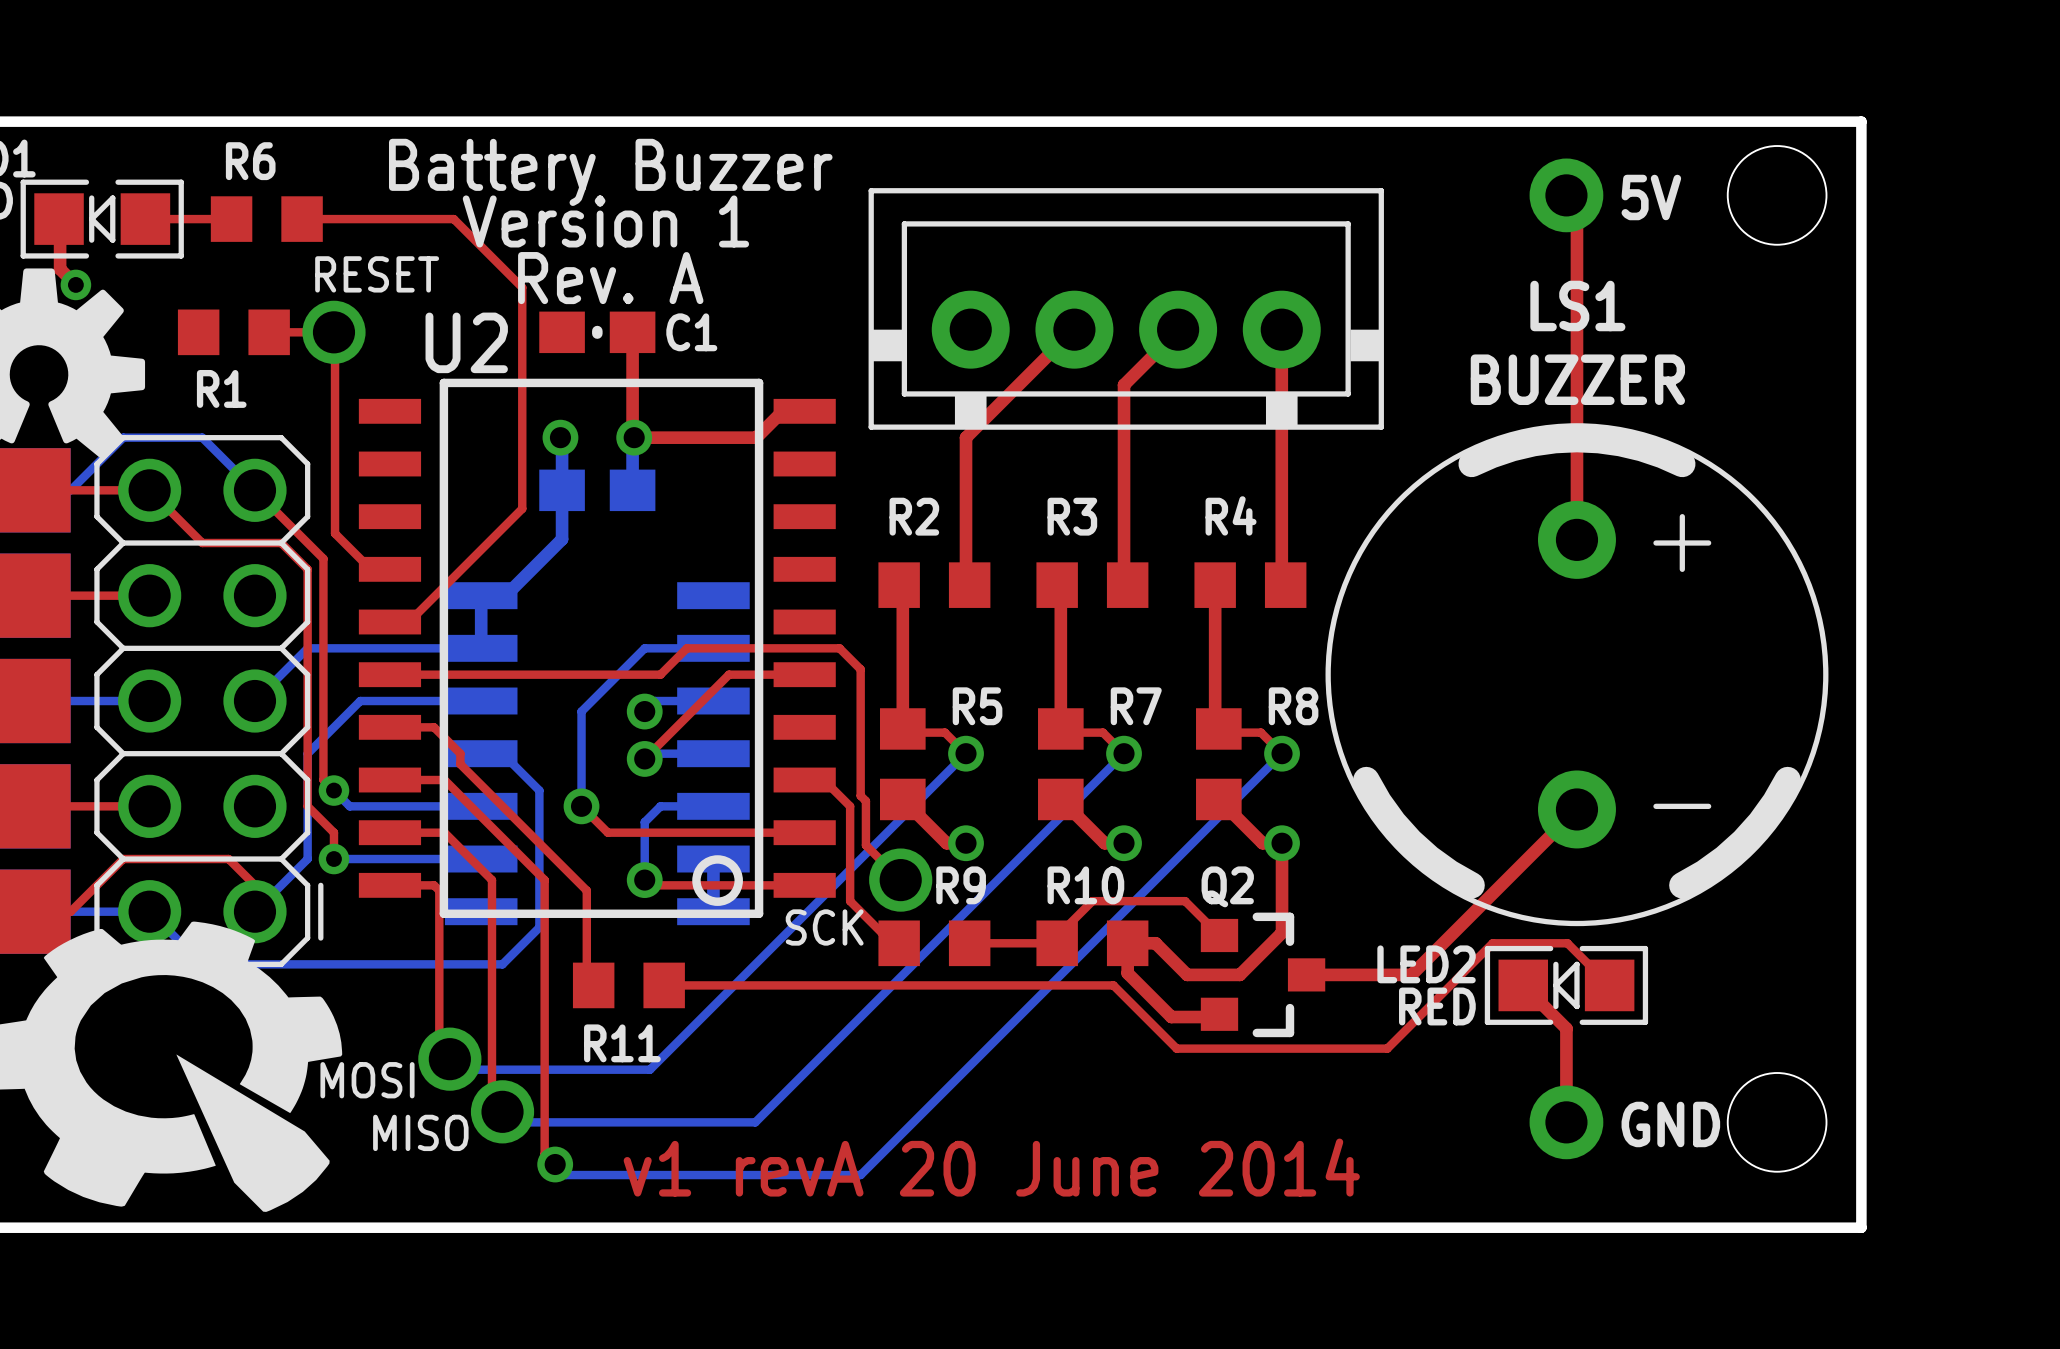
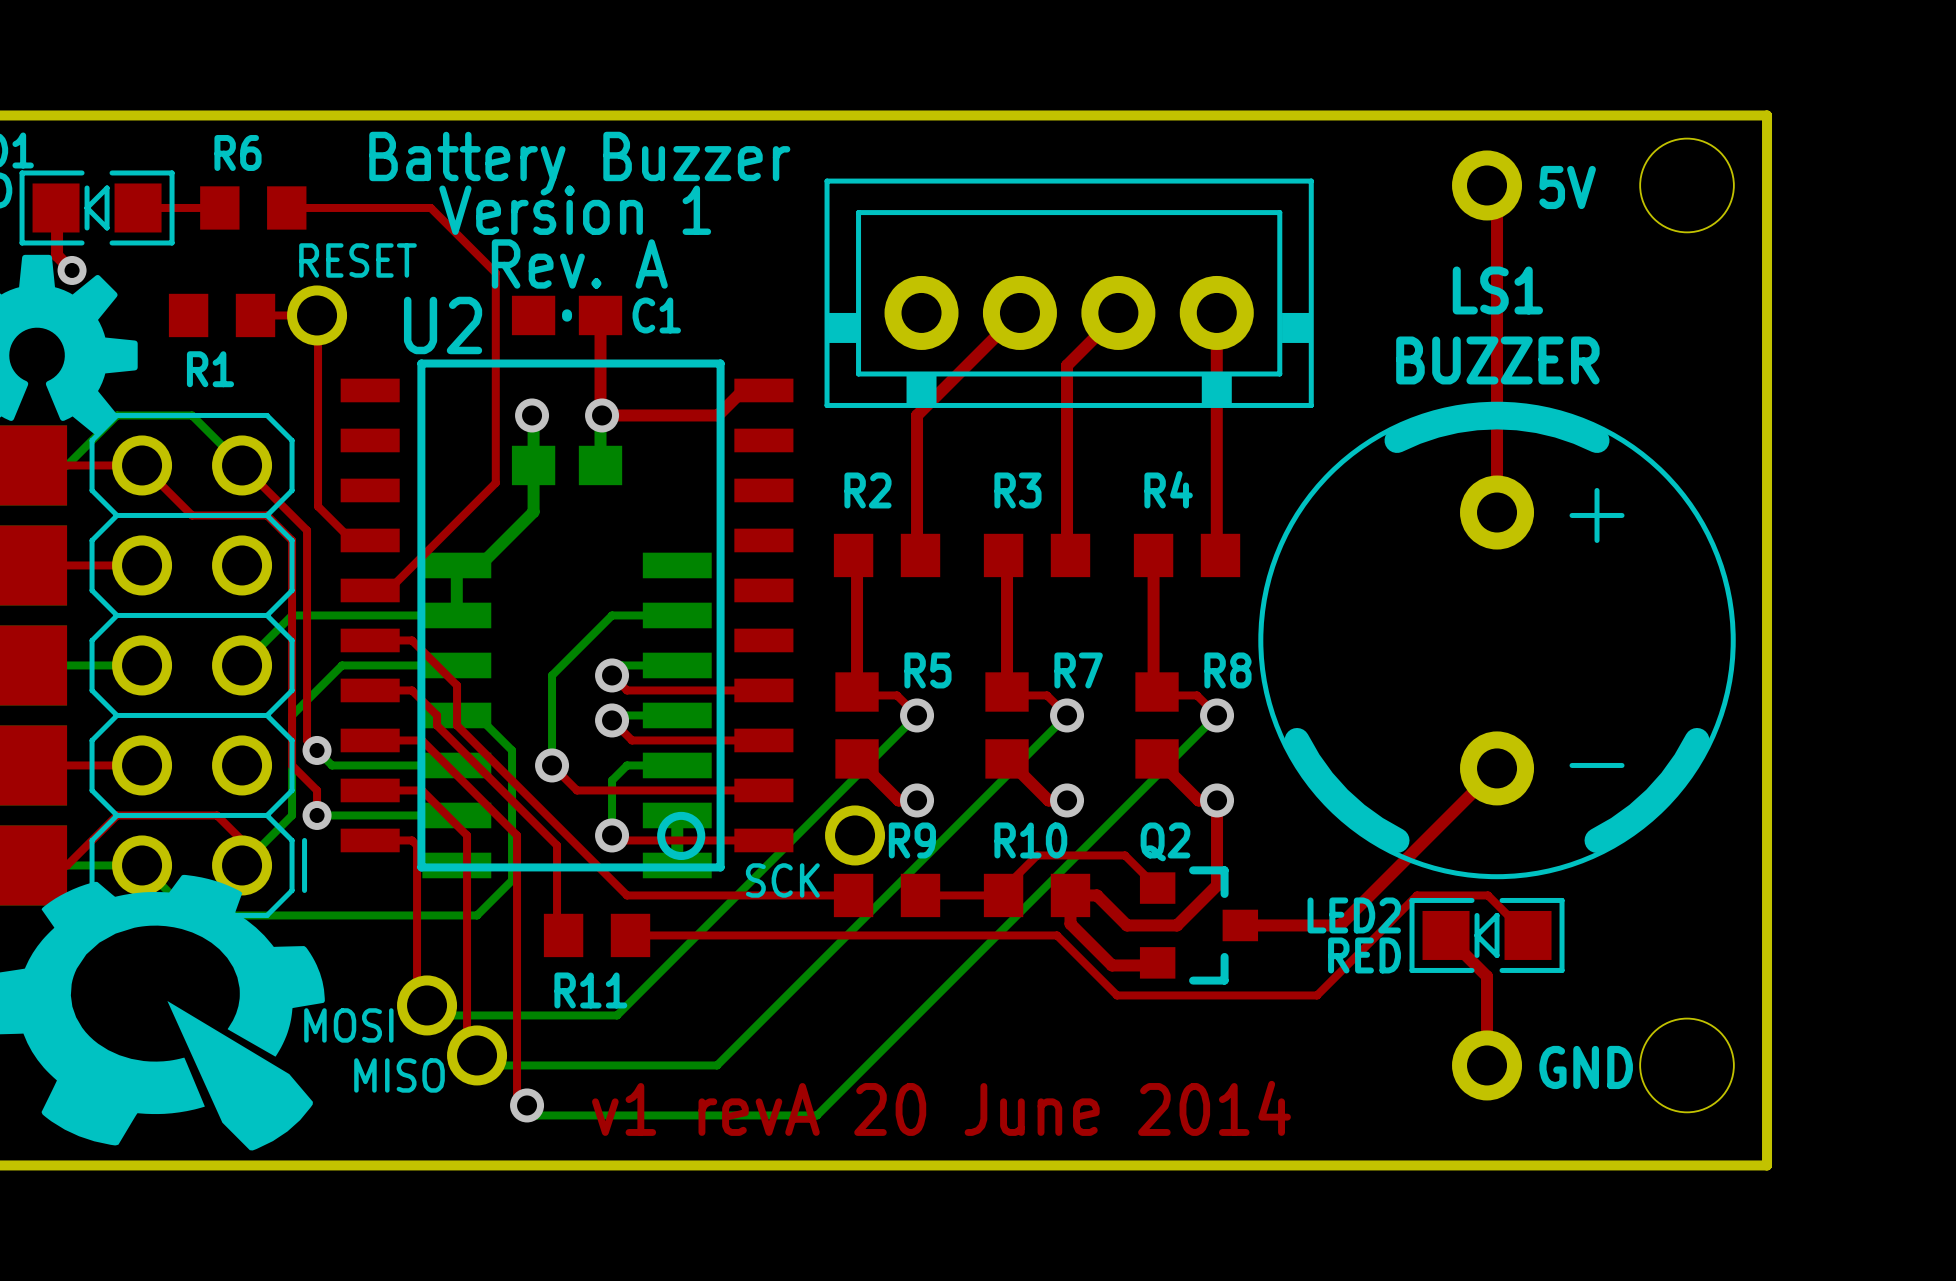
top track: (434, 674) (660, 674) (686, 648) (839, 648) (860, 669) (860, 795) (865, 801) (865, 845) (900, 880) -> (412, 640) (457, 685) (457, 725) (627, 895) (853, 895)
top track: (804, 674) (729, 674) (644, 758) -> (763, 740) (632, 740) (612, 720)
top track: none -> (612, 675) (627, 690) (763, 690)
top track: (804, 780) (823, 780) (850, 806) (850, 901) (881, 932) (888, 932) (899, 943) -> none

